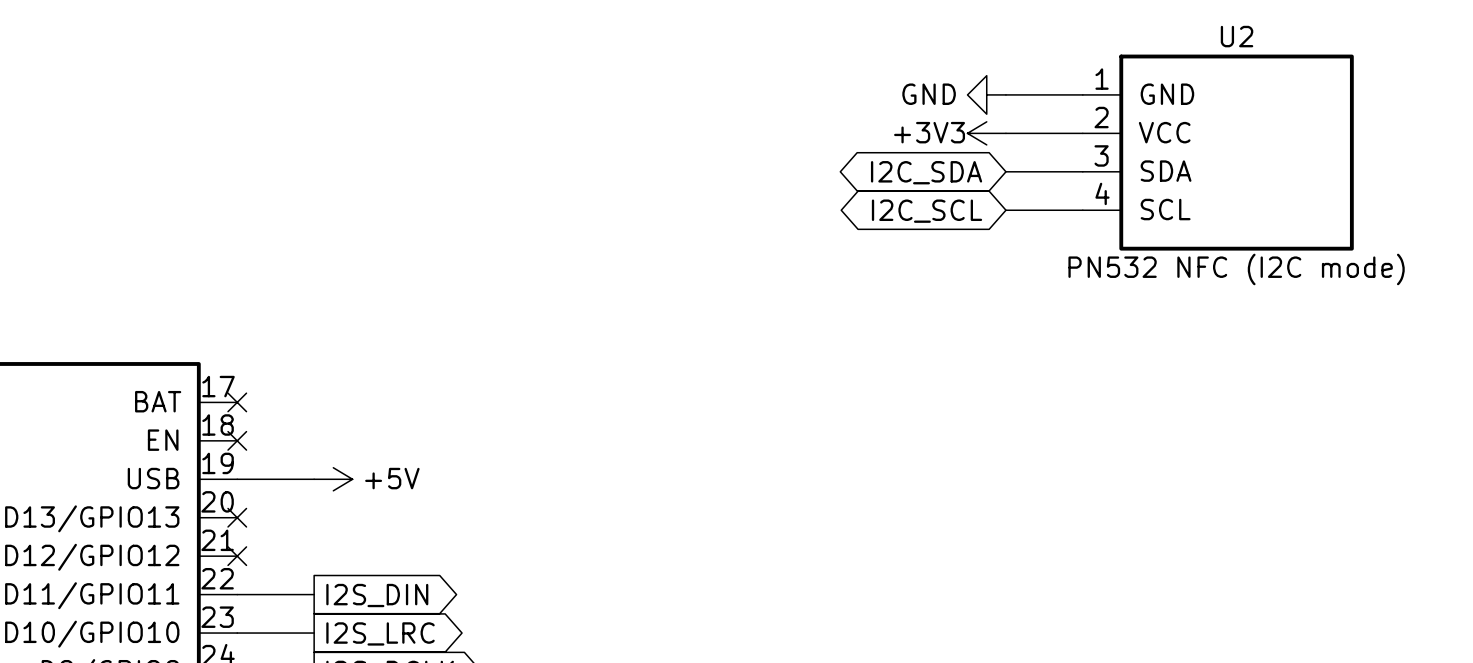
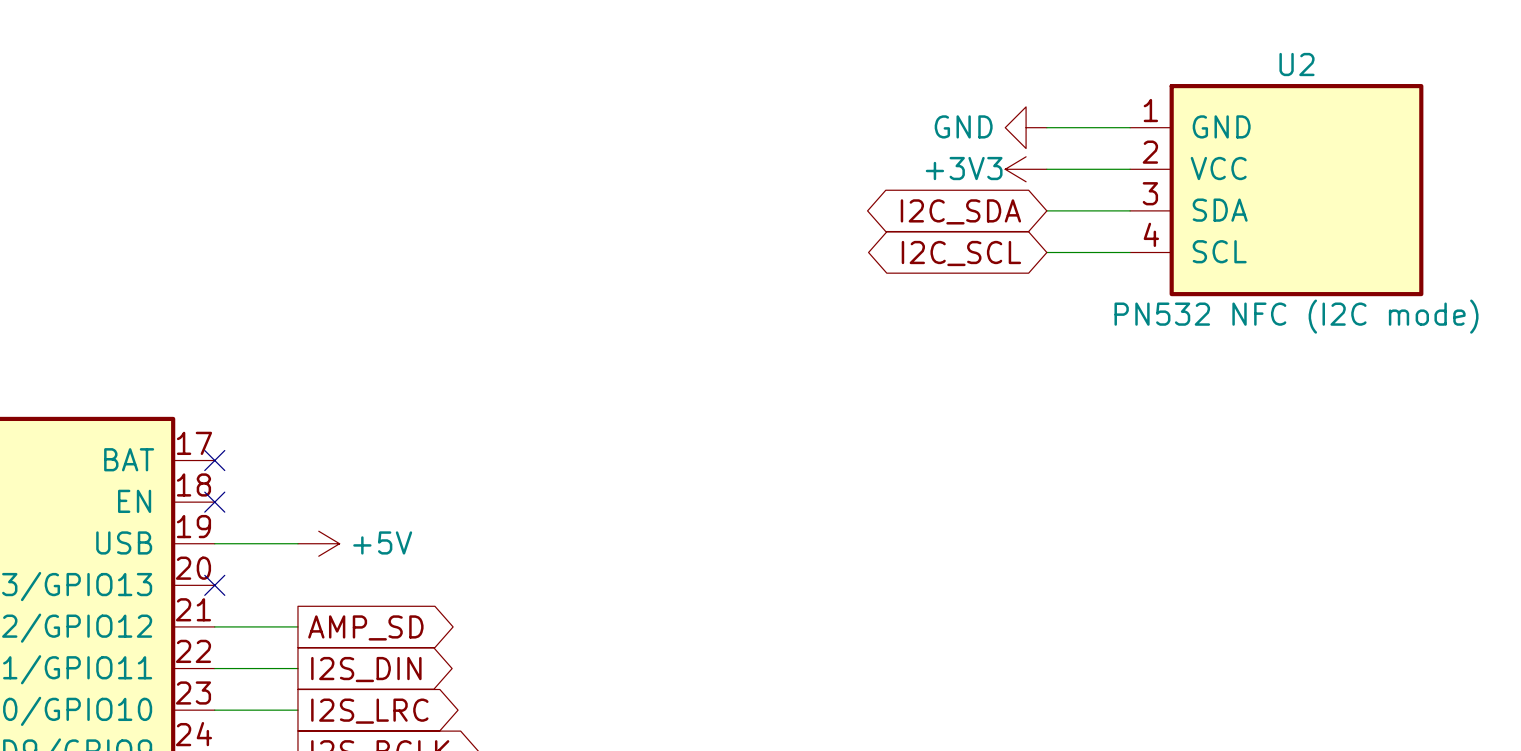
wire: none -> (214, 626) (297, 626)
no-connect mark: (237, 556) -> none
global label: none -> AMP_SD (365, 627)

